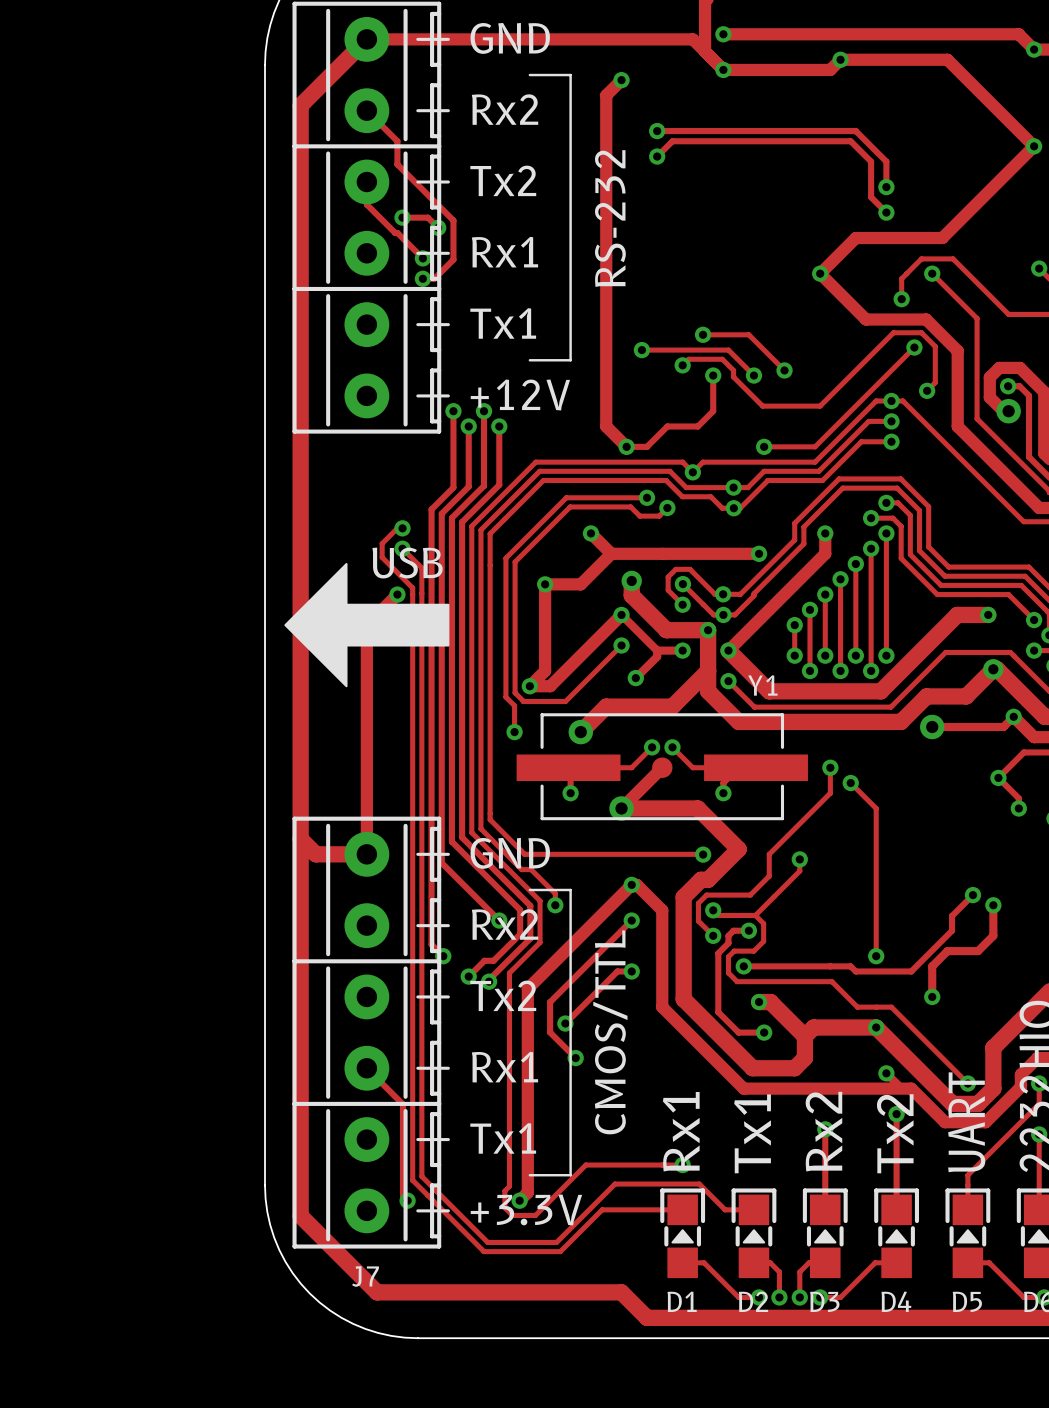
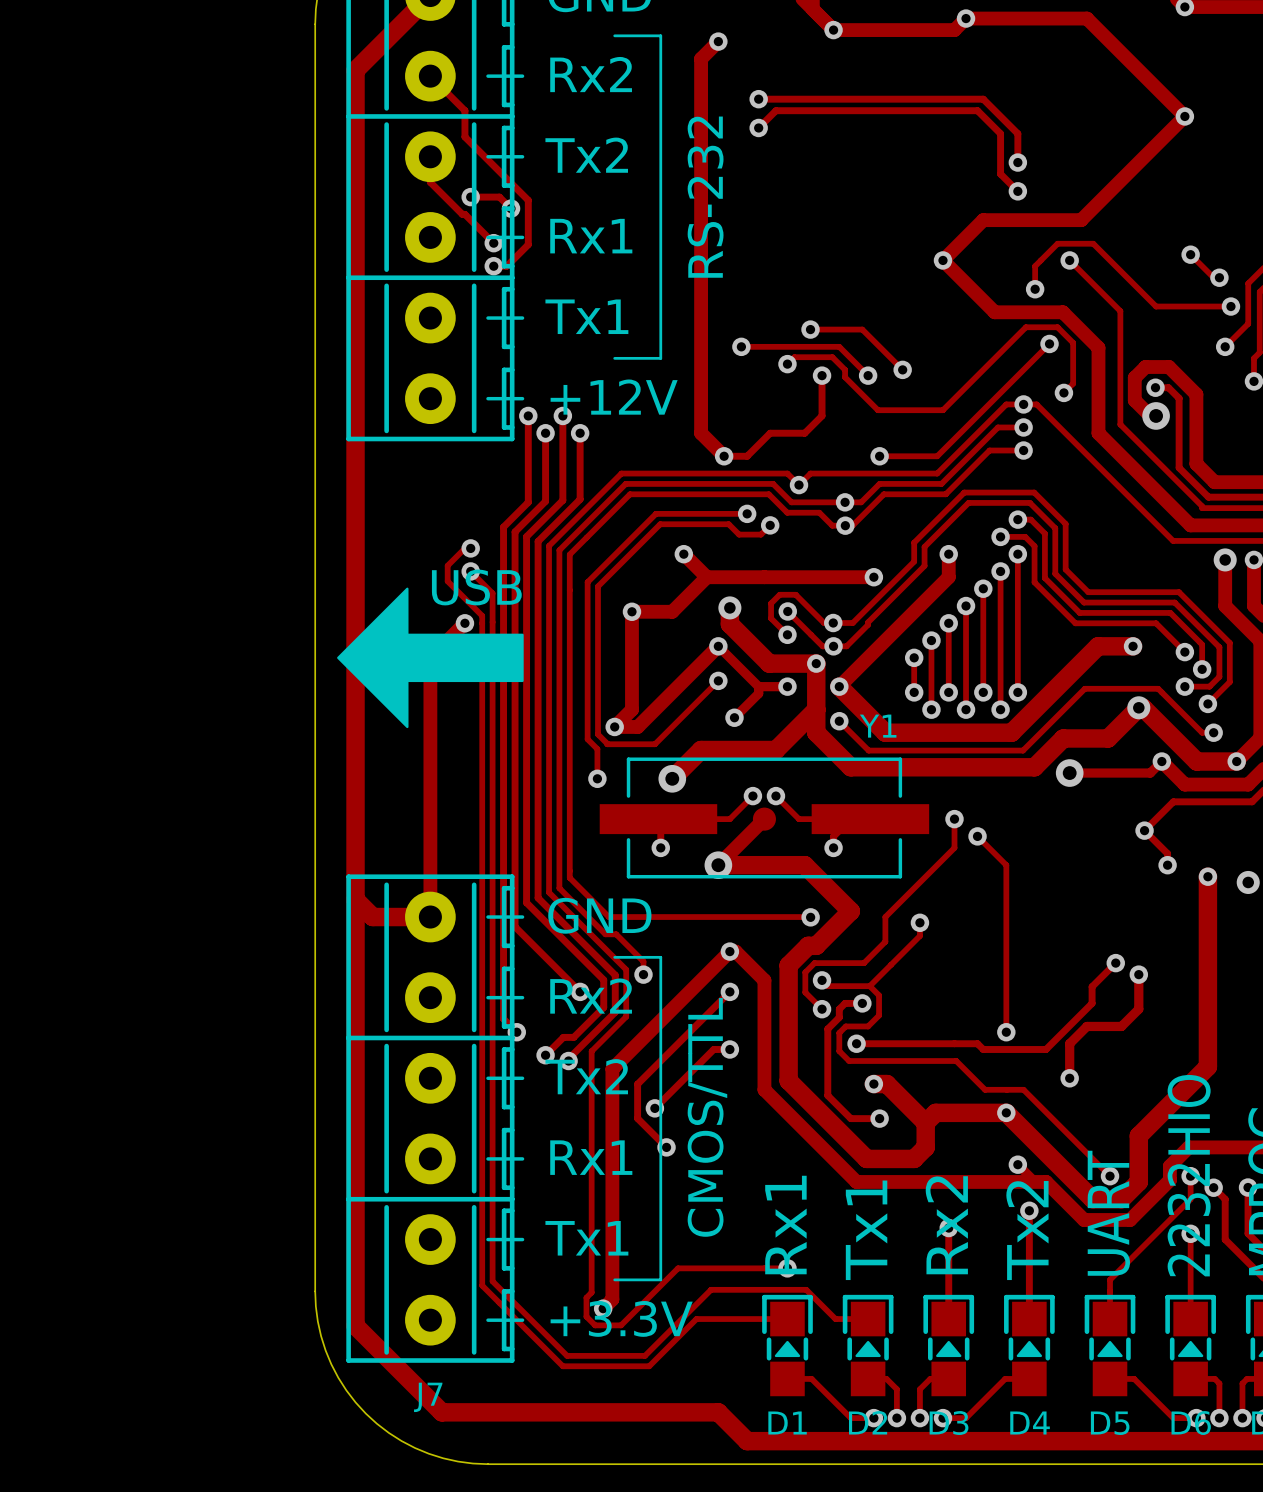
track: (366, 1068) (403, 1104) (403, 1196) (407, 1200) -> none
via: (407, 1200) -> none

